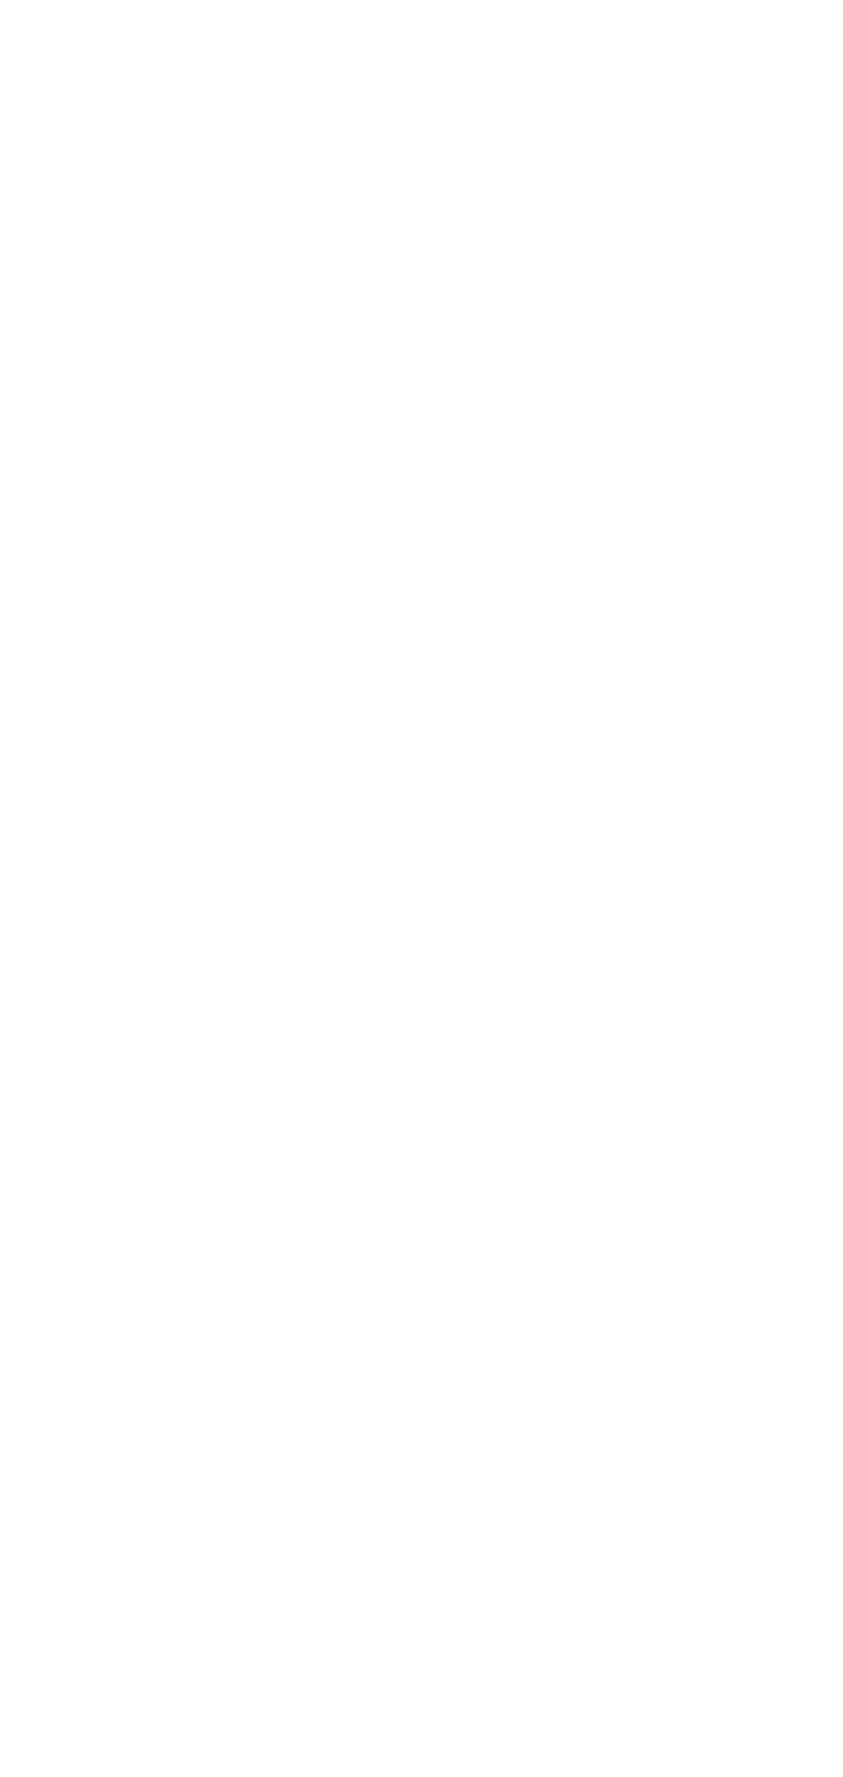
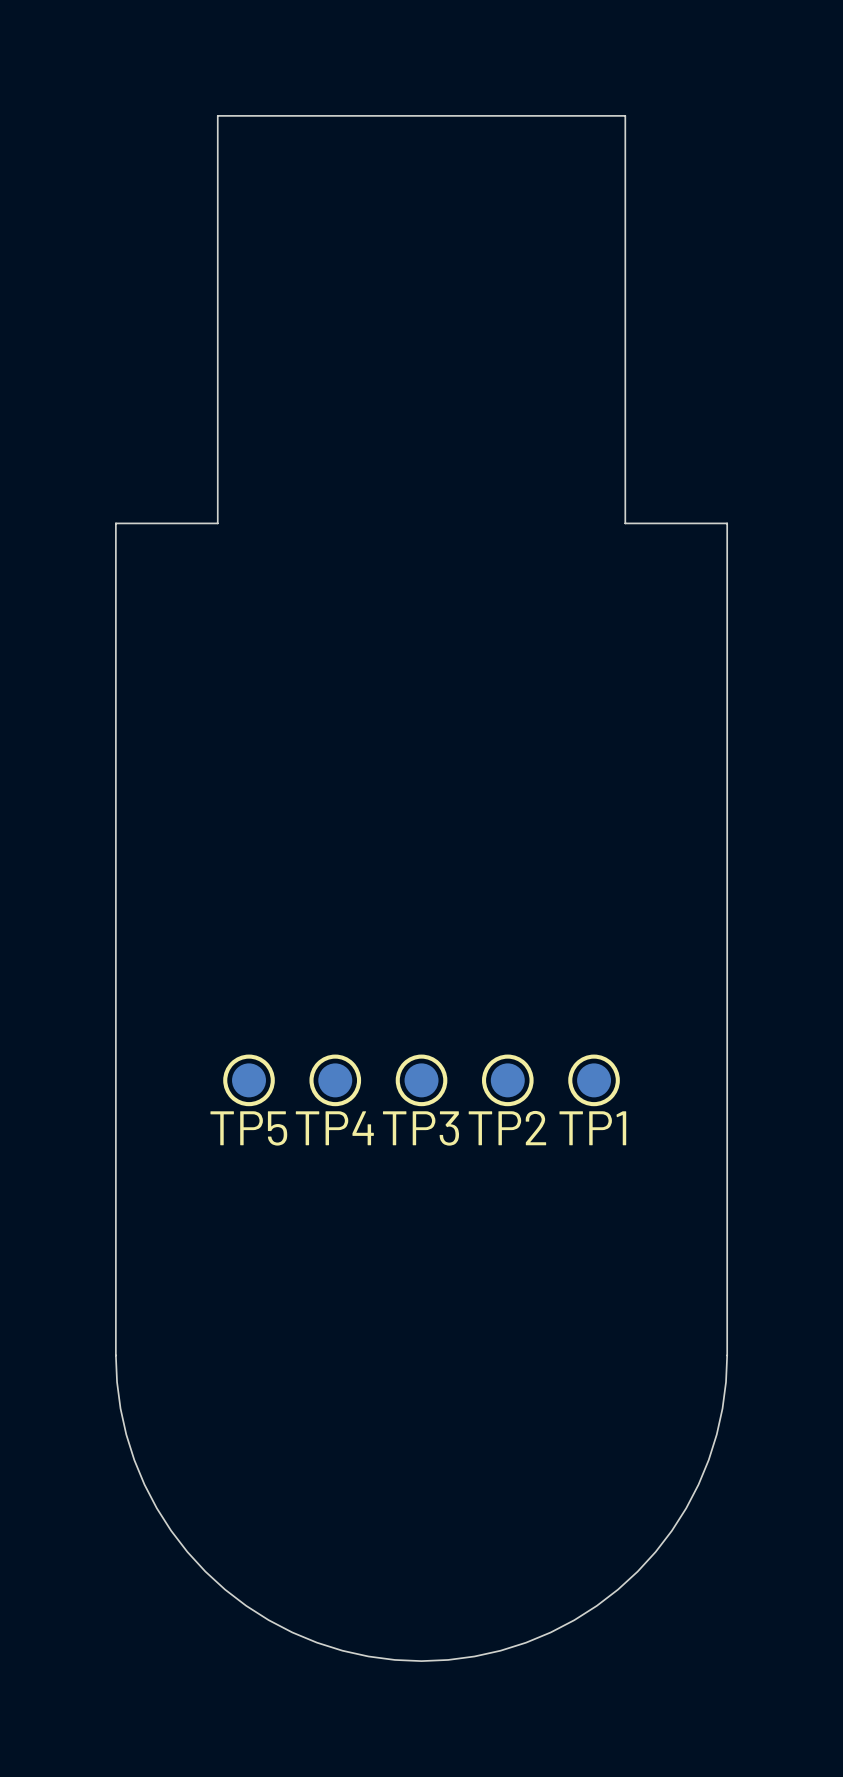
board edge: none -> (625, 115) (217, 115) (217, 523) (115, 523) (115, 1355) (120, 1408) (126, 1434) (134, 1459) (156, 1508) (187, 1551) (225, 1589) (268, 1620) (292, 1632) (342, 1650) (368, 1656) (421, 1661) (474, 1656) (500, 1650) (550, 1632) (596, 1605) (618, 1589) (655, 1551) (686, 1508) (708, 1459) (722, 1408) (727, 1355) (727, 523) (625, 523) (625, 115)
TP5: none -> (249, 1080)
TP4: none -> (335, 1080)
TP3: none -> (421, 1080)
TP2: none -> (507, 1080)
TP1: none -> (594, 1080)

